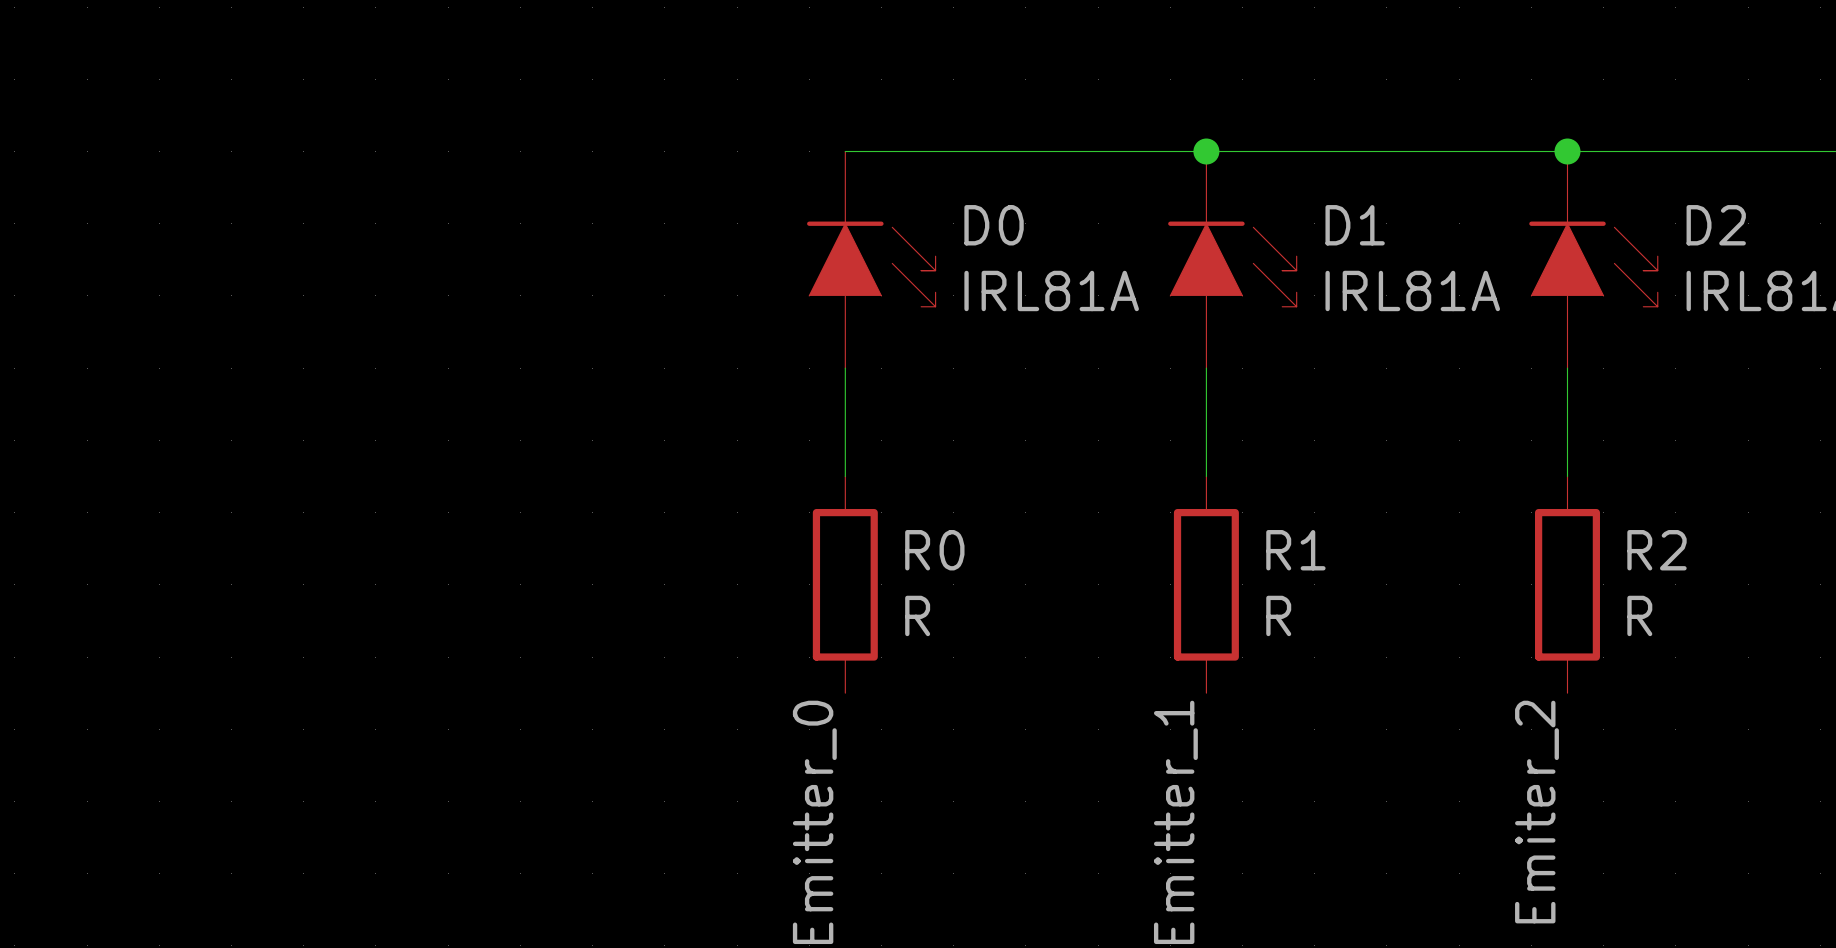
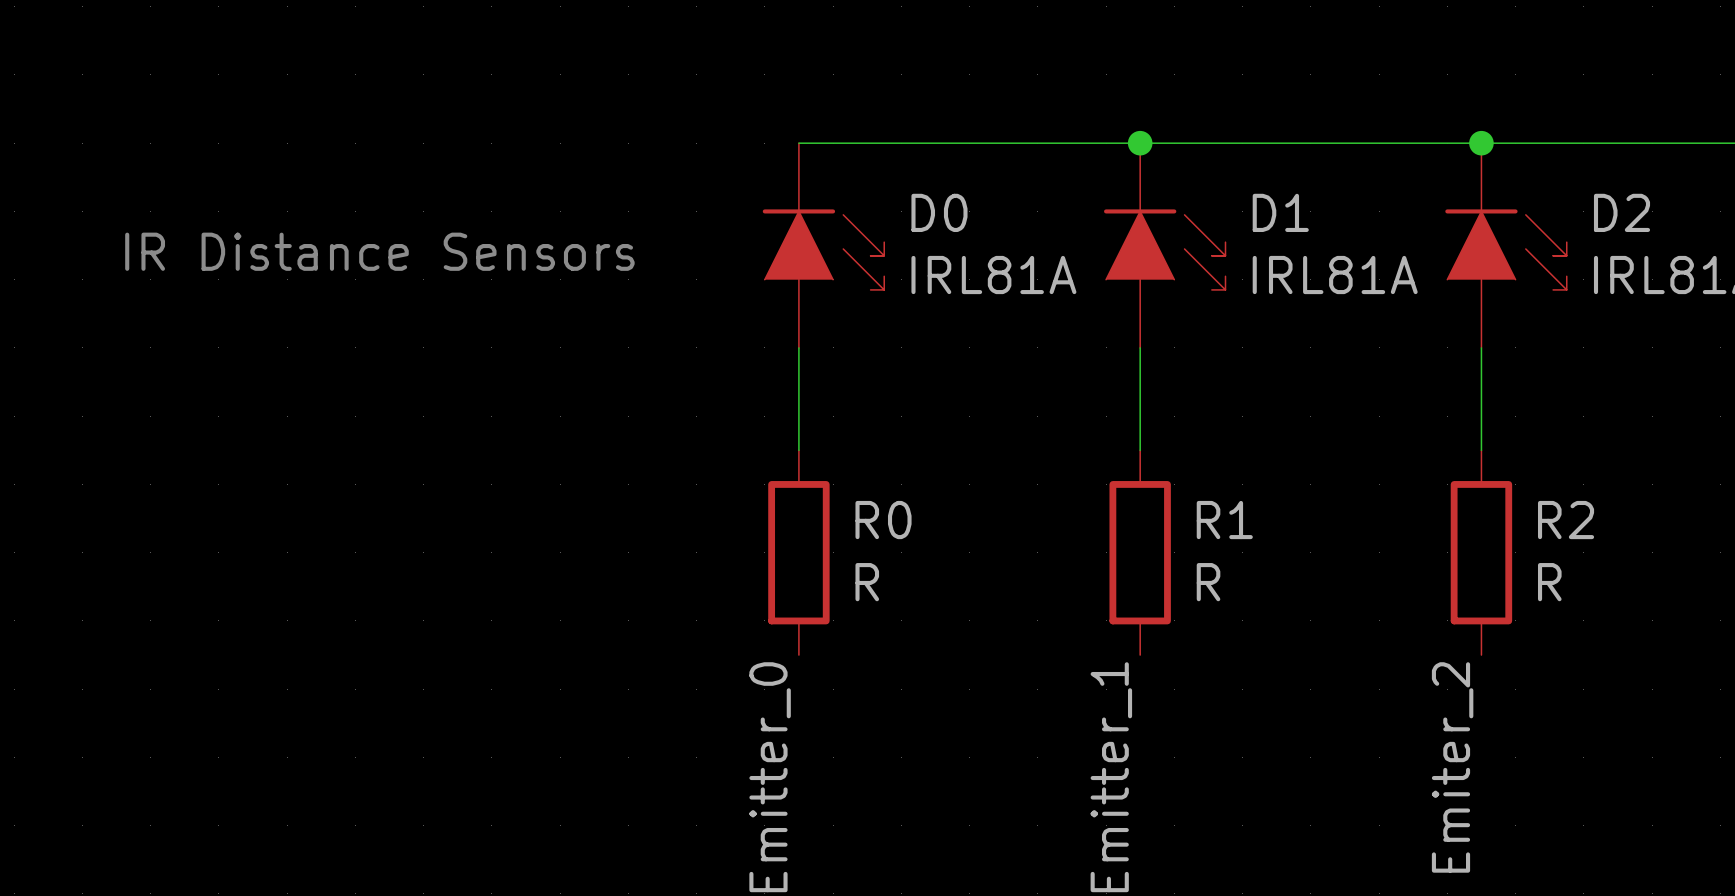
text: none -> IR Distance Sensors (379, 251)

